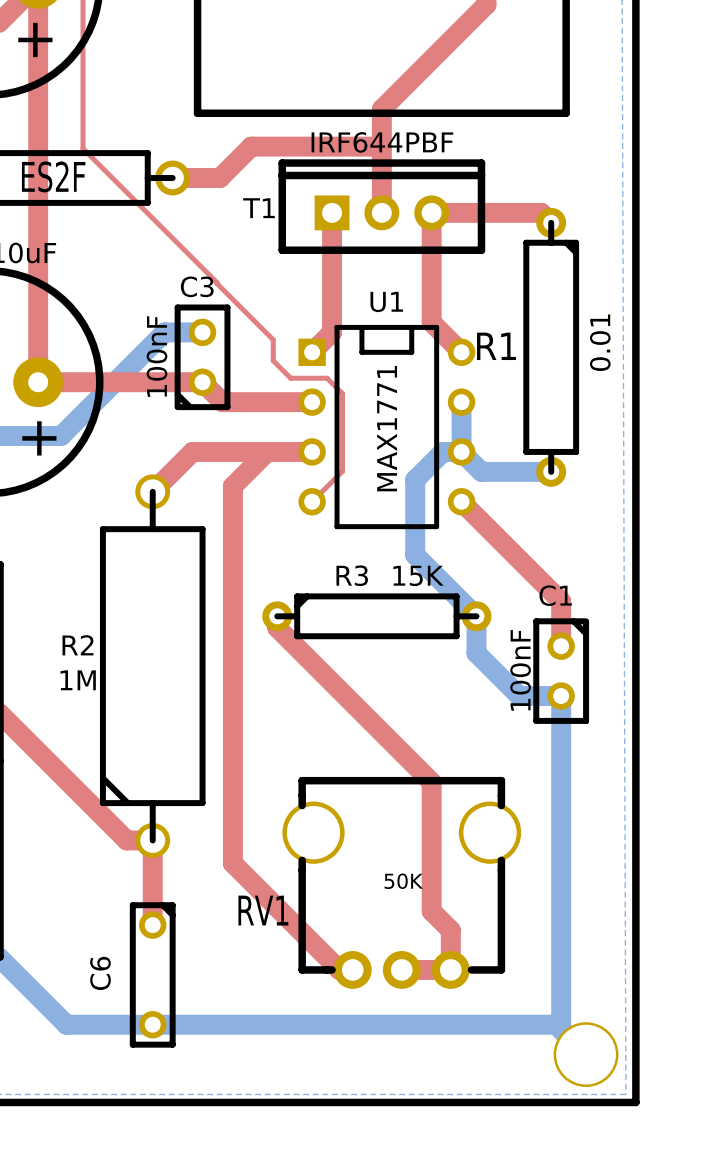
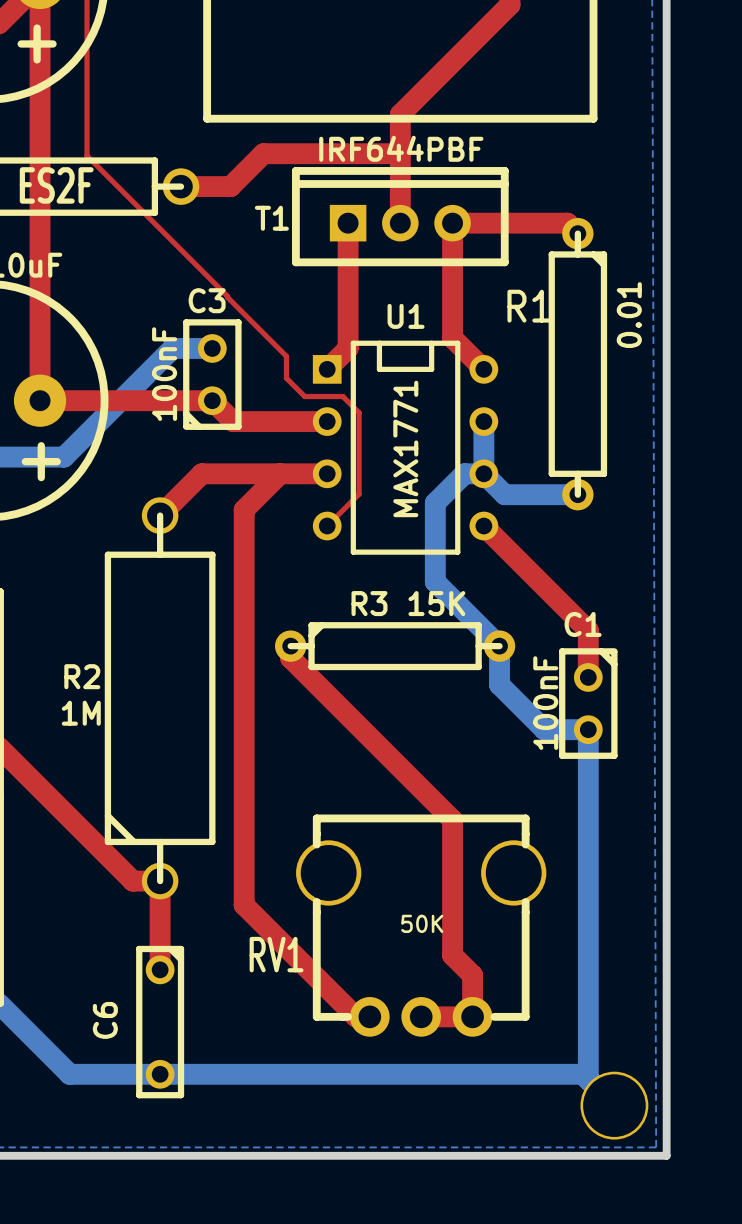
R1 value position: 0.01 (600, 342) -> 0.01 (629, 315)
R1 name position: R1 (496, 346) -> R1 (529, 306)

